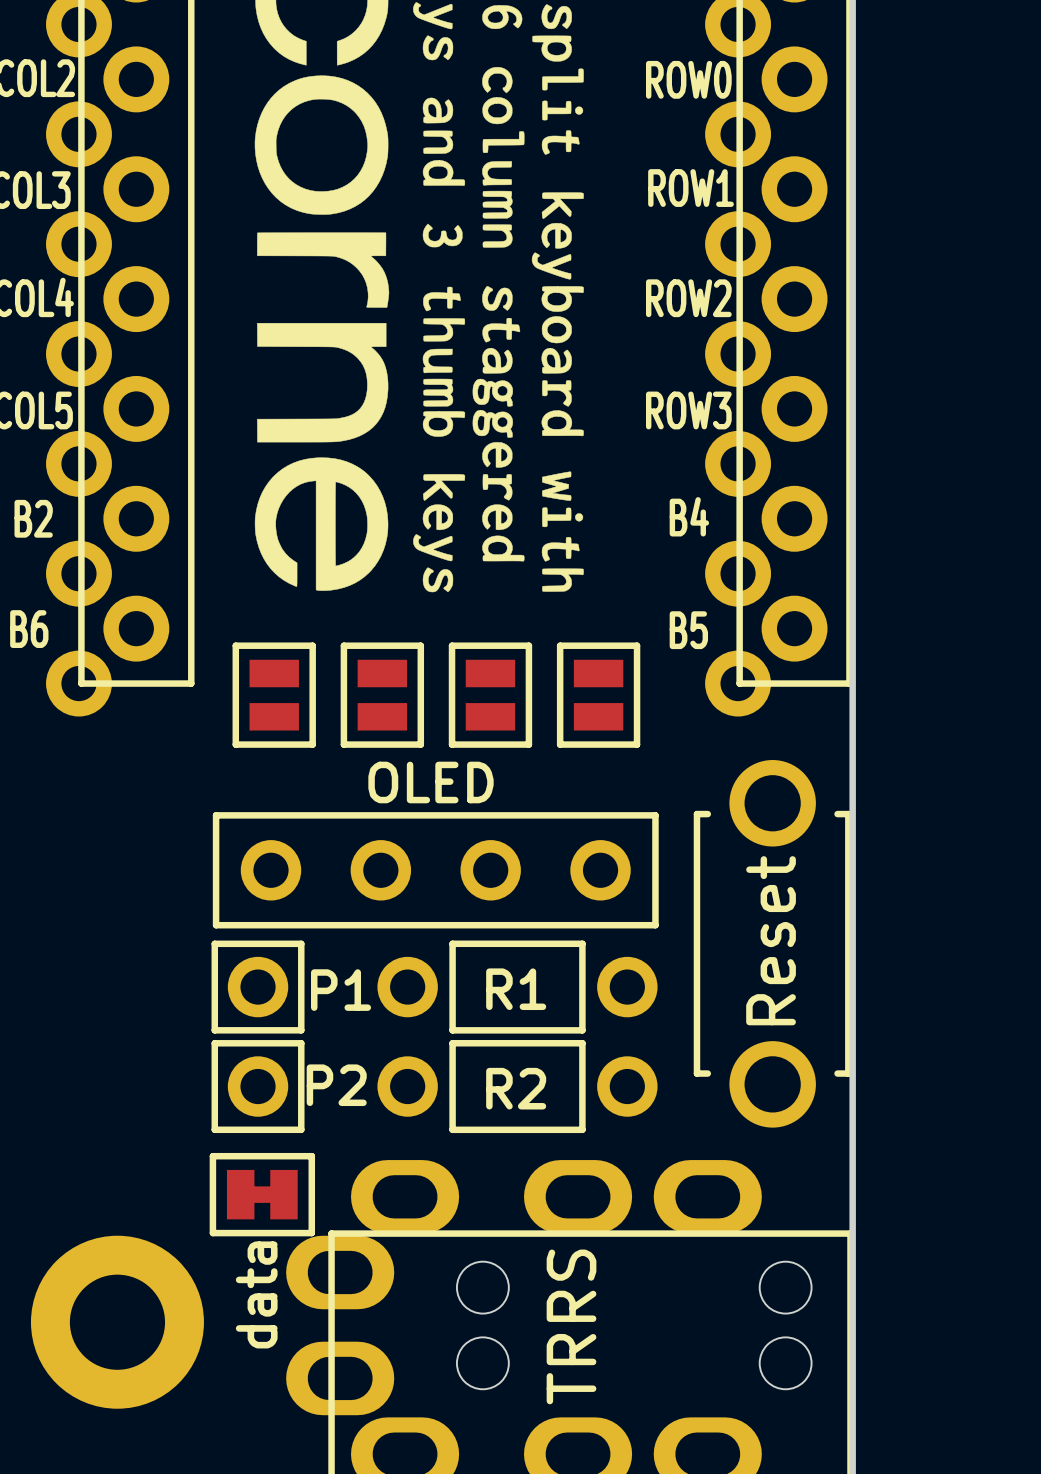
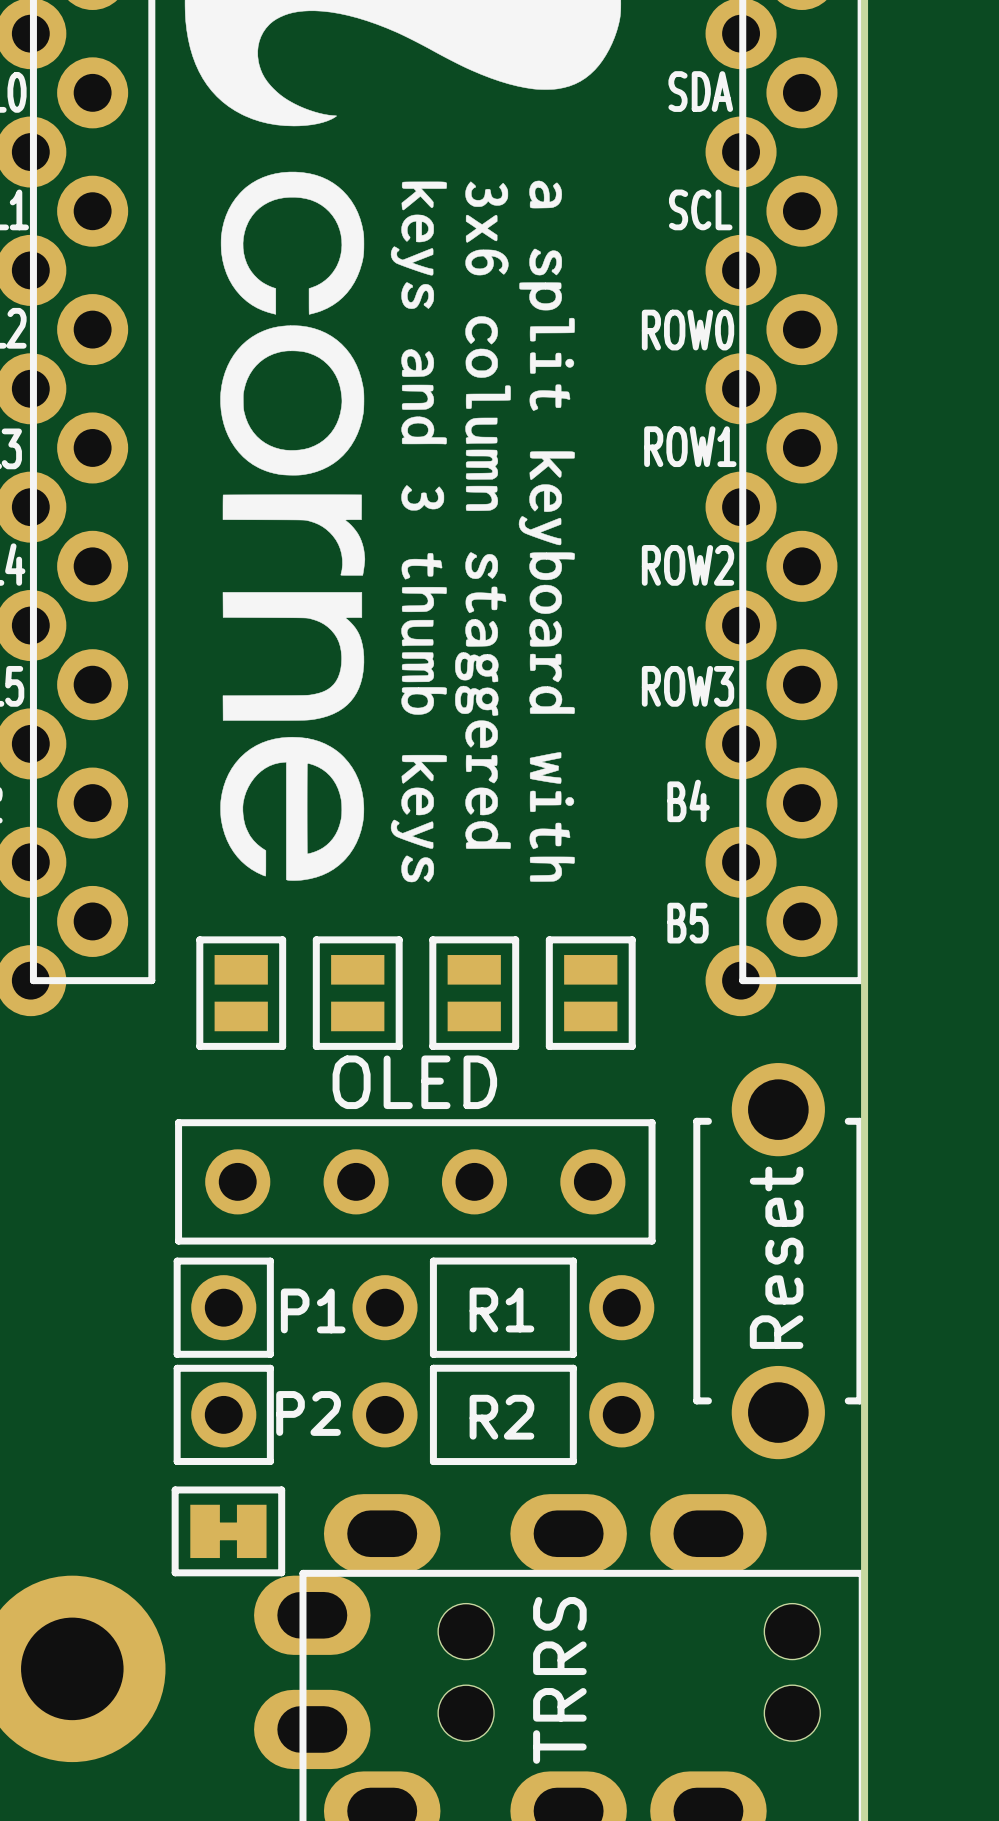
OLED text: none -> OLED (414, 1082)
OLED name: OLED (431, 782) -> none
data name: data (256, 1294) -> none
TRRS name: TRRS (571, 1326) -> none
TRRS text: none -> TRRS (559, 1680)

